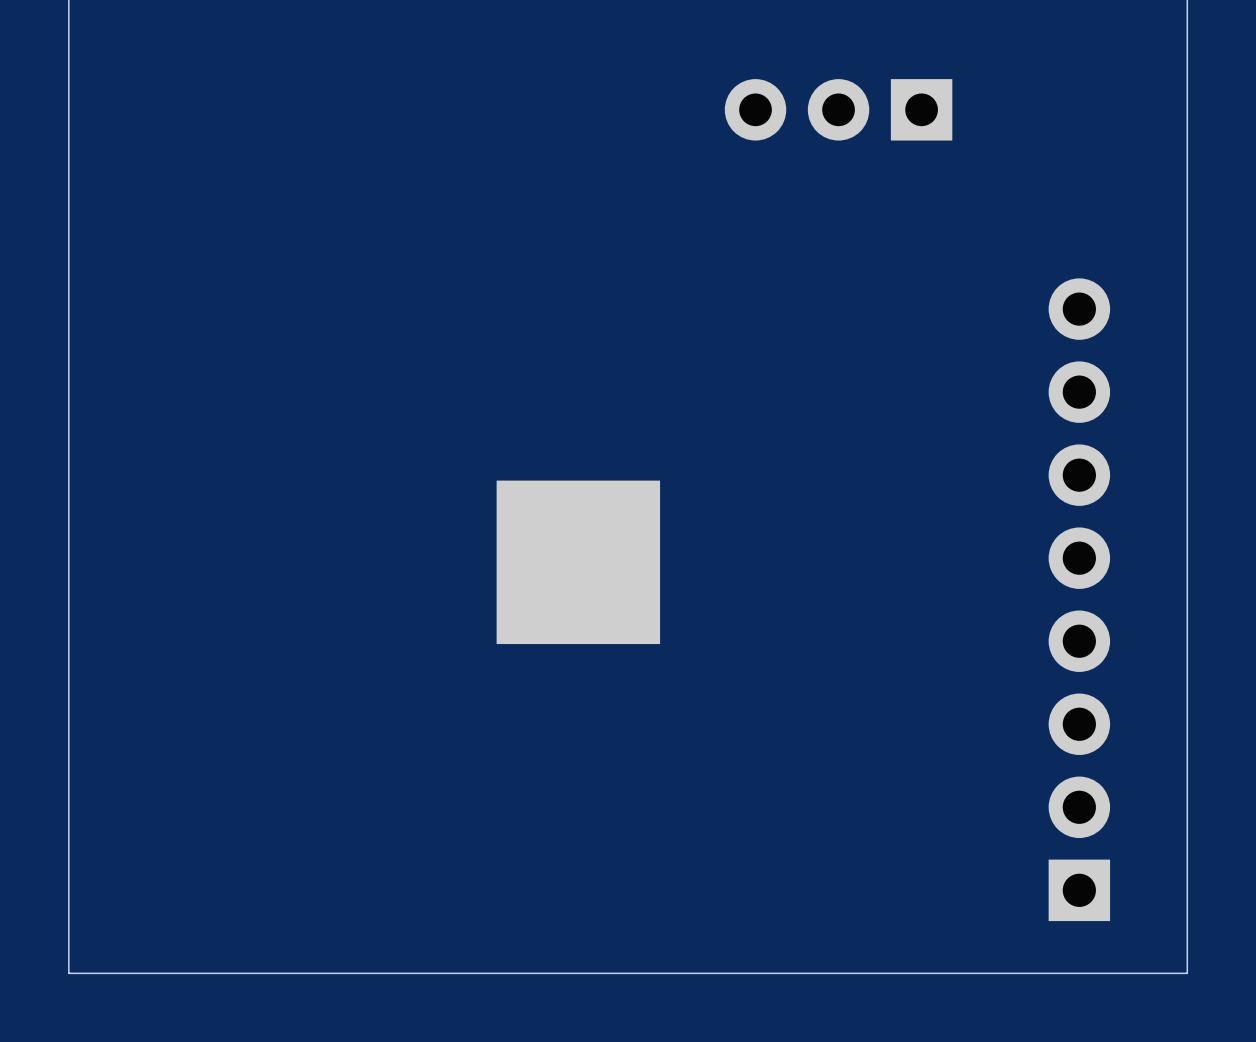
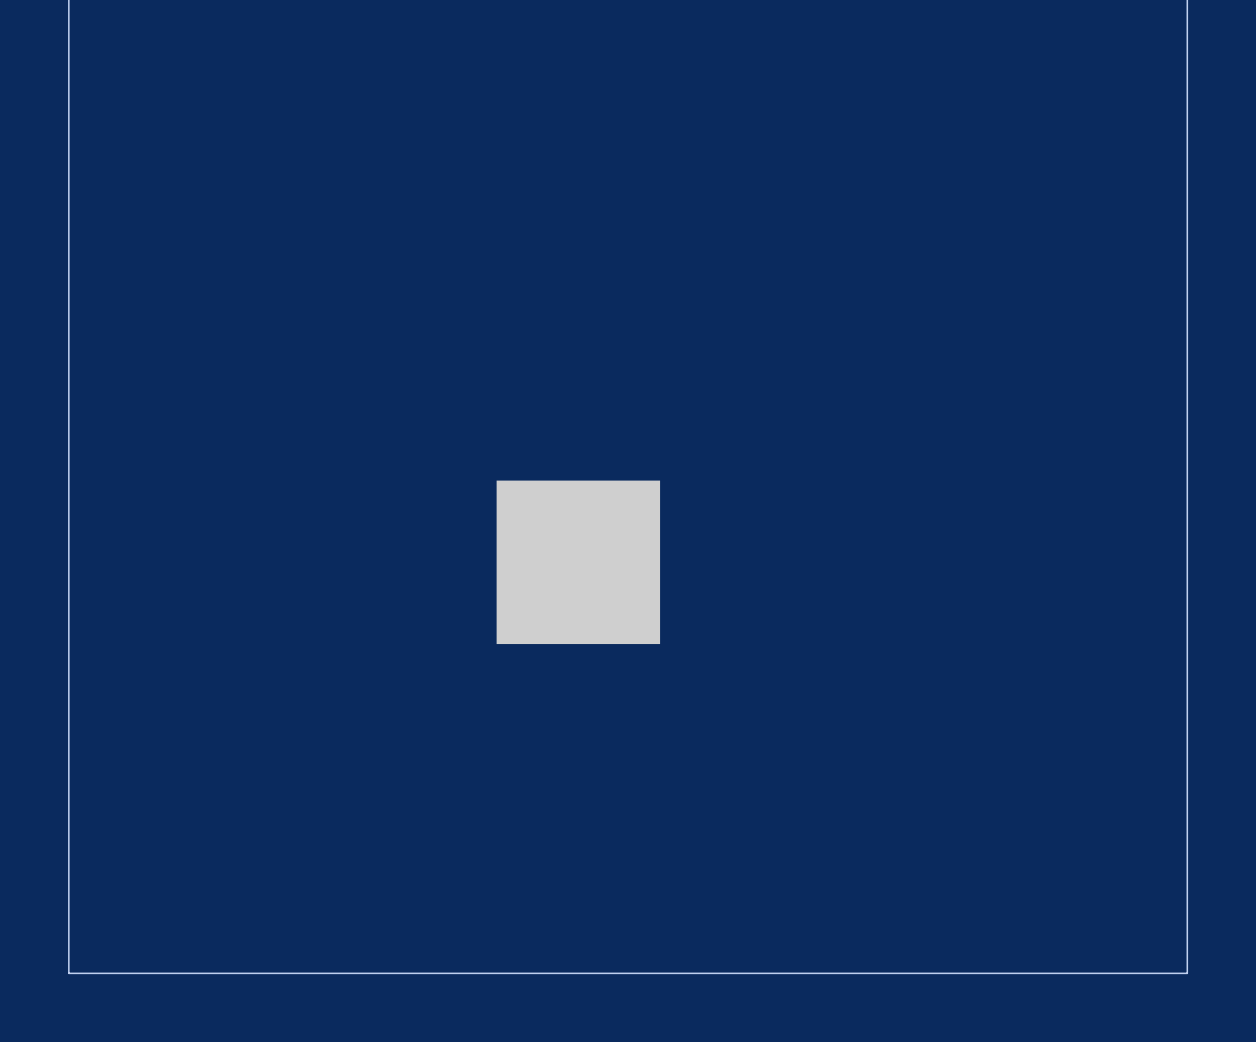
part: (838, 109) -> none
part: (1079, 599) -> none

